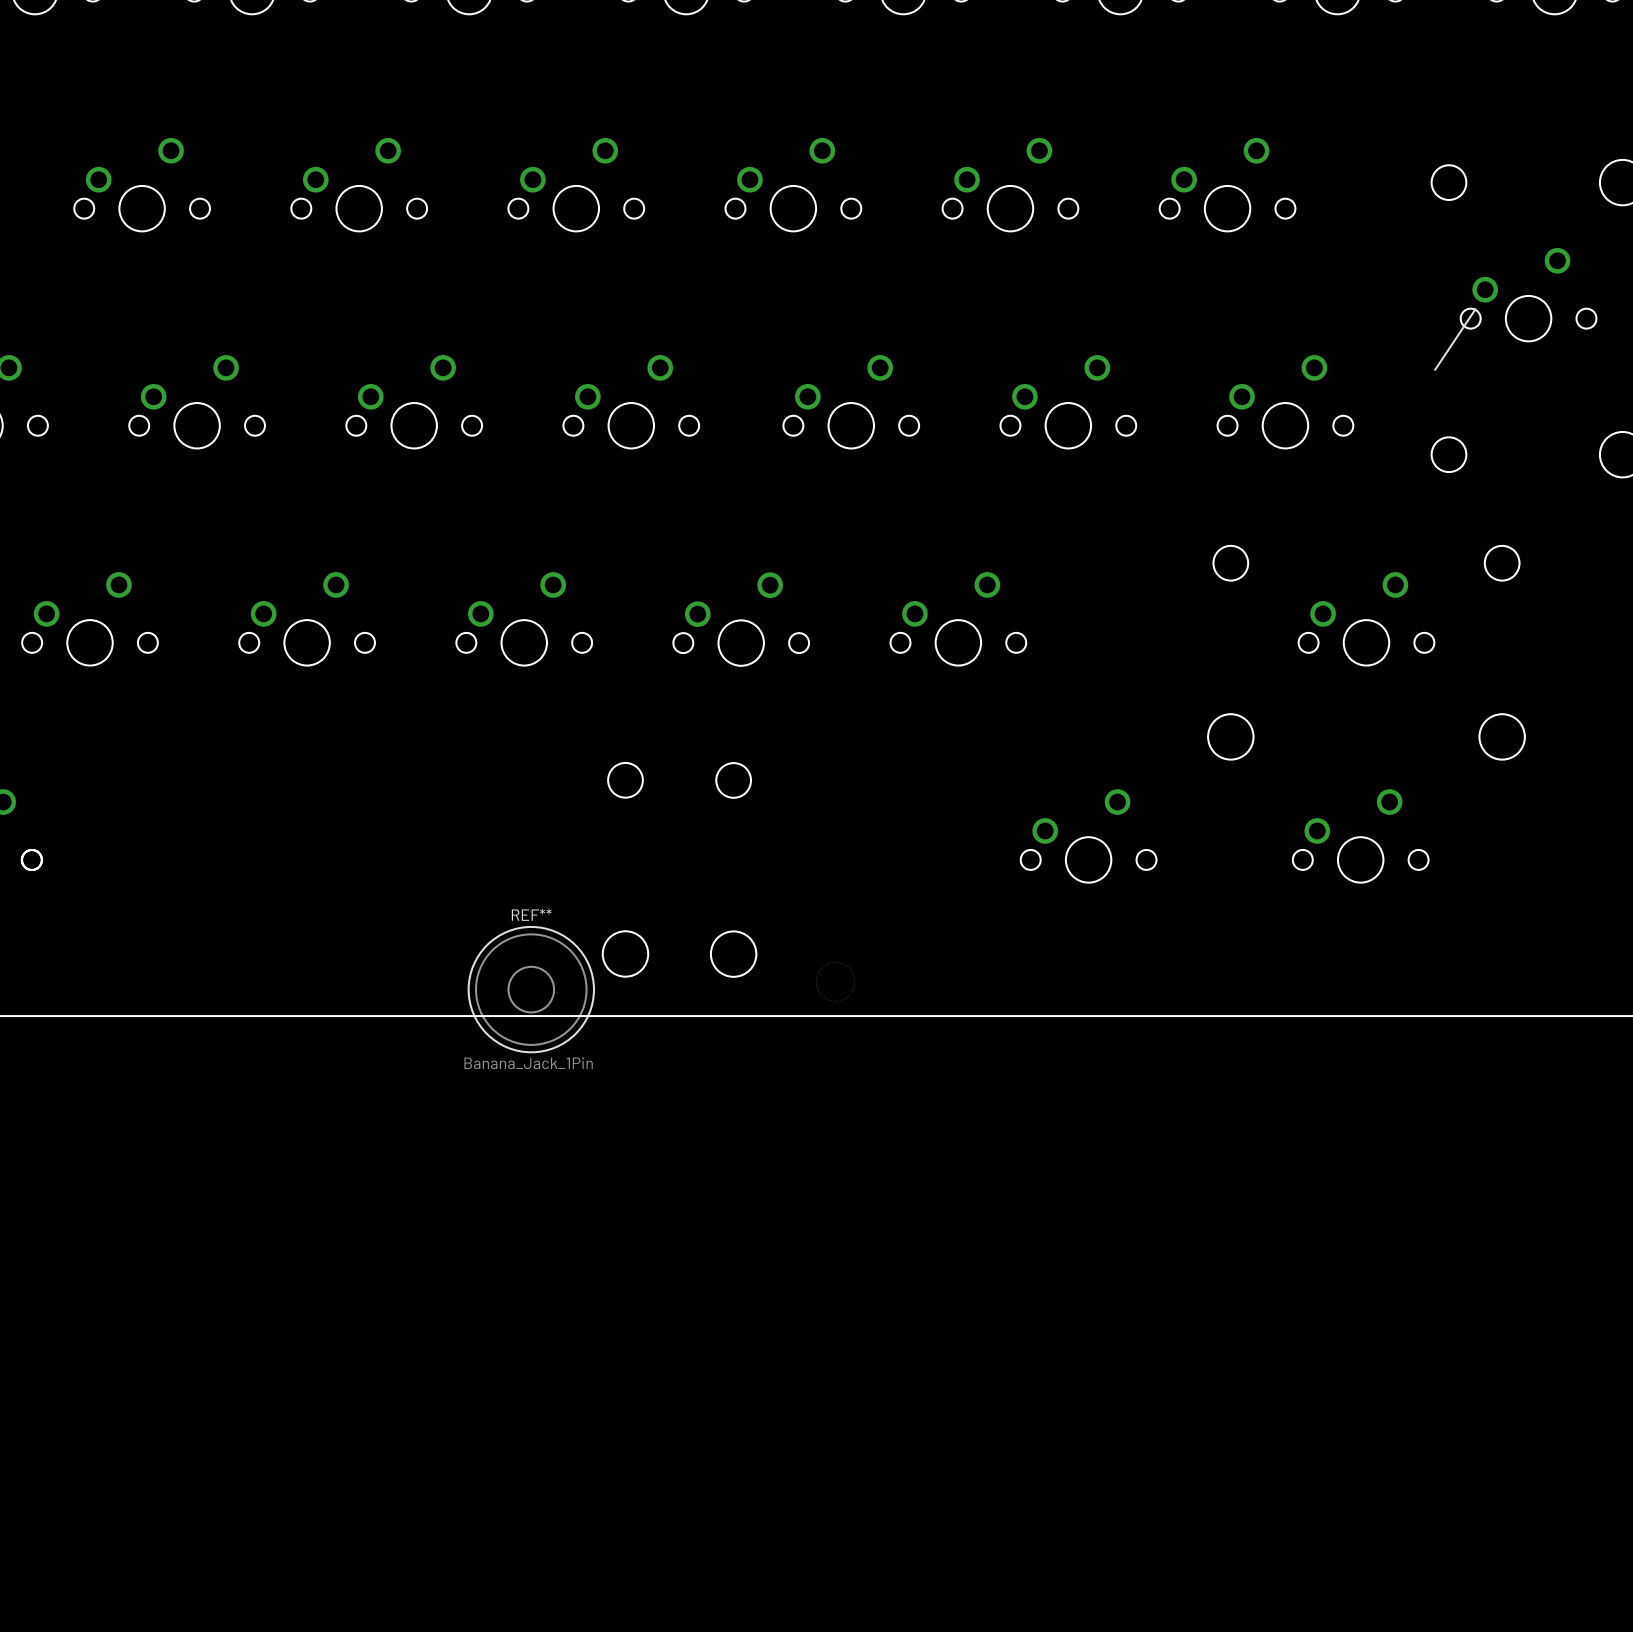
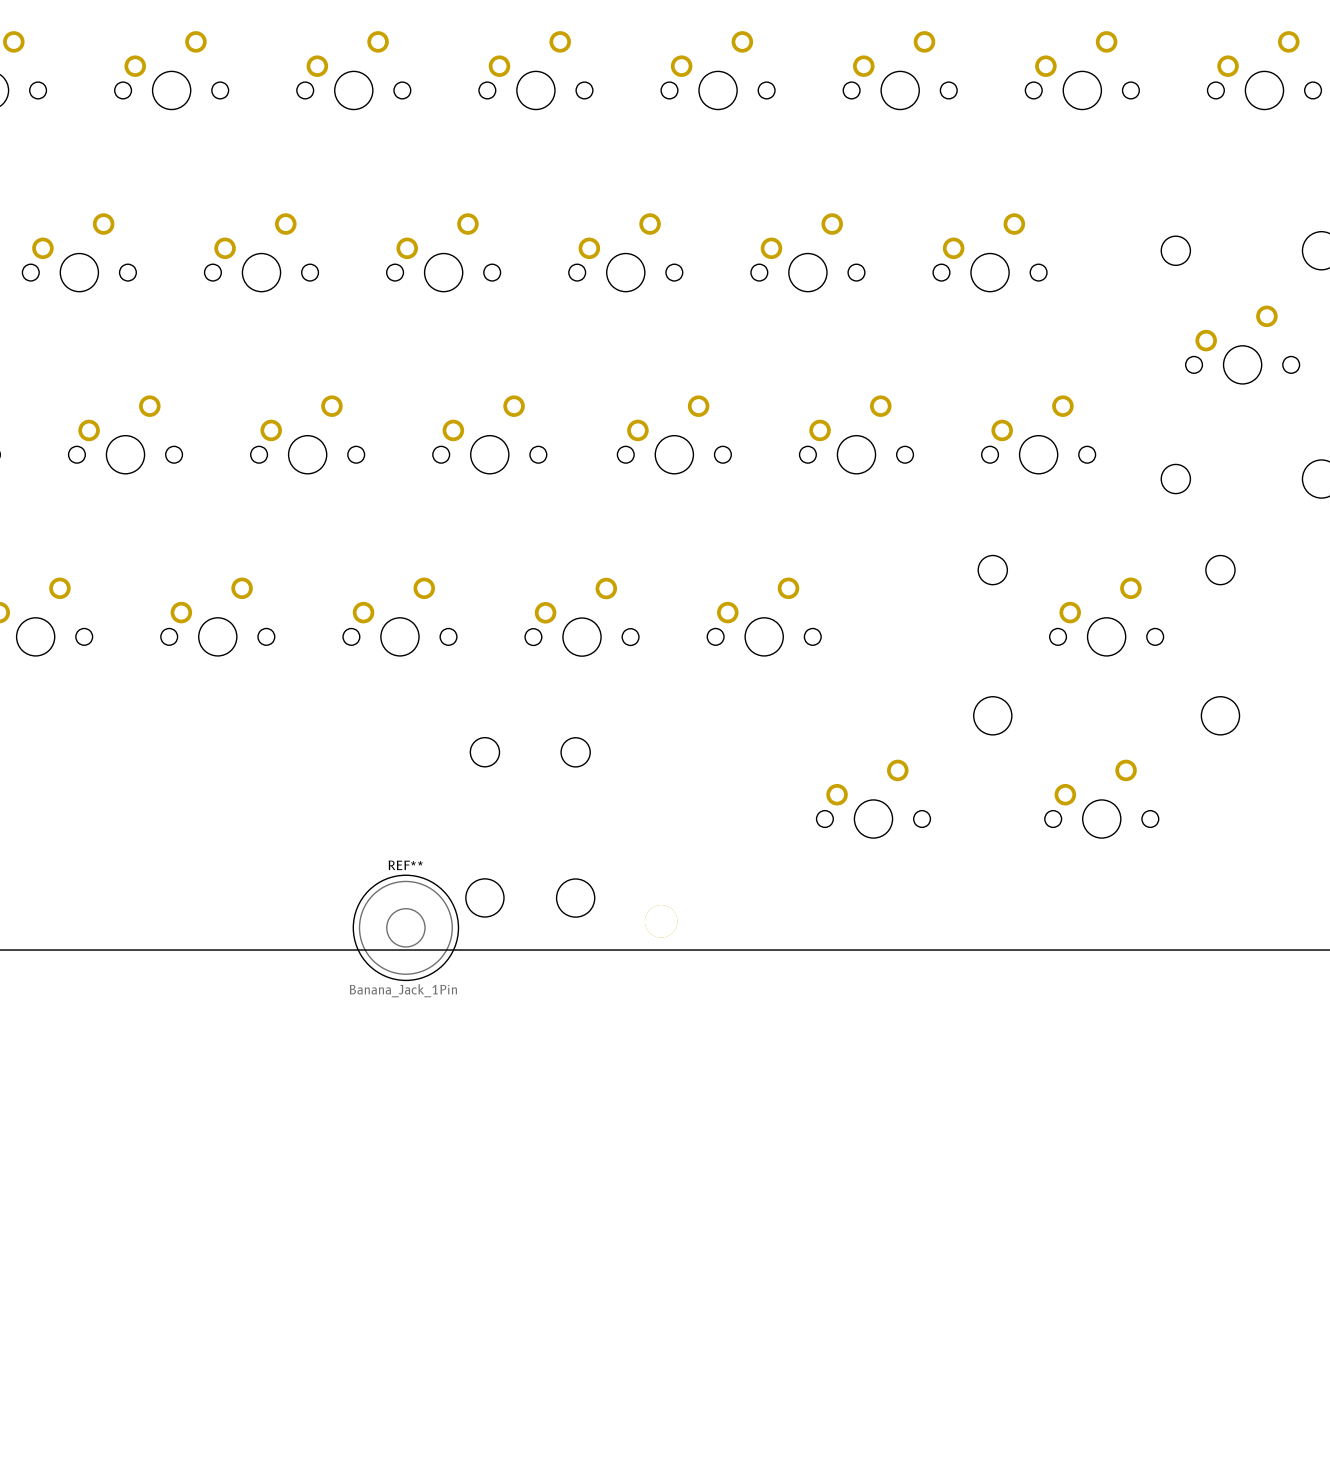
line: (1475, 309) (1435, 369) -> none

